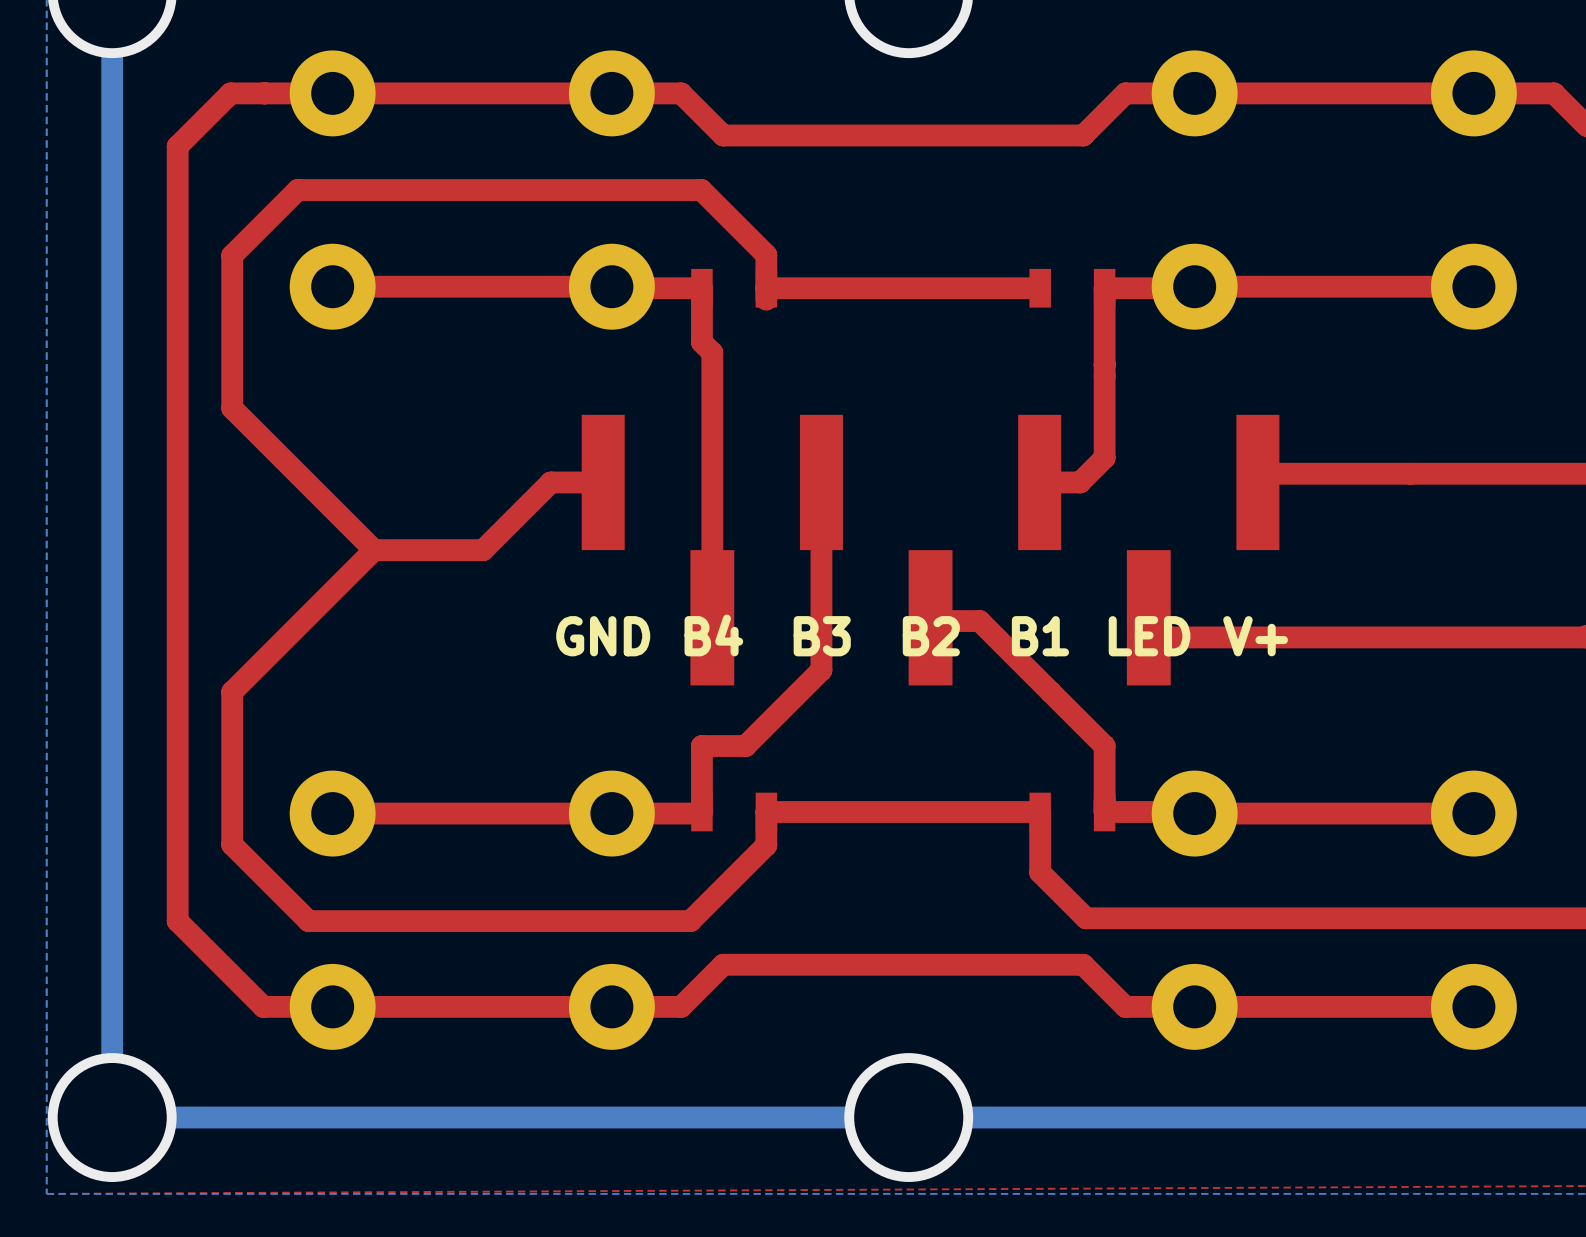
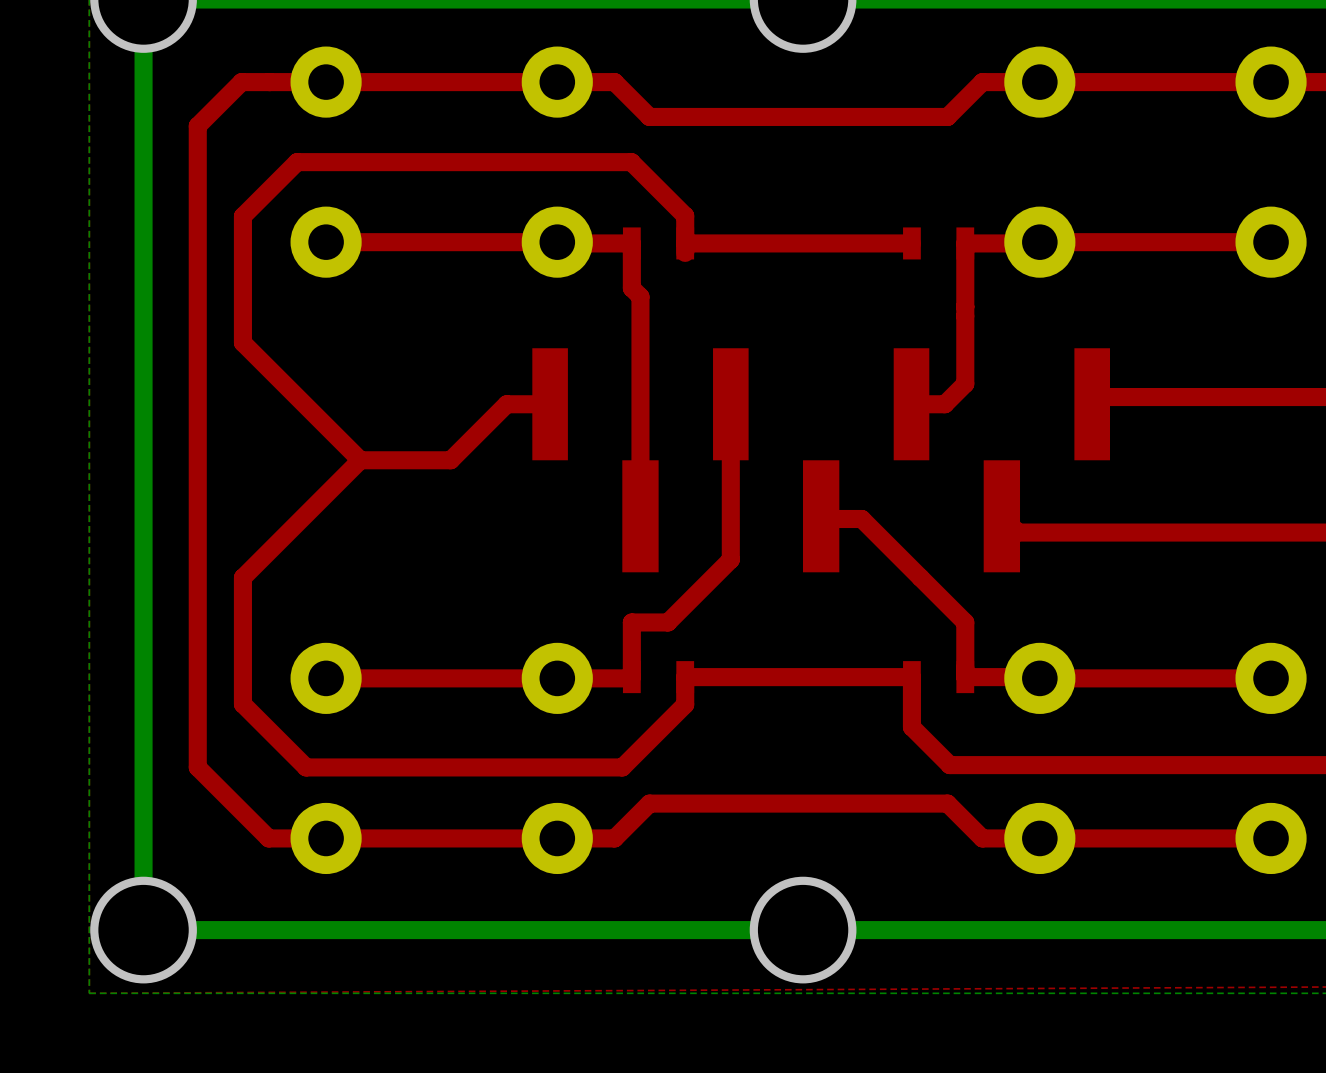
text: B4 (713, 635) -> none
text: GND (603, 636) -> none
text: B3 (822, 636) -> none
text: B2 (931, 636) -> none
text: B1 (1040, 636) -> none
text: LED (1149, 636) -> none
text: V+ (1255, 636) -> none

